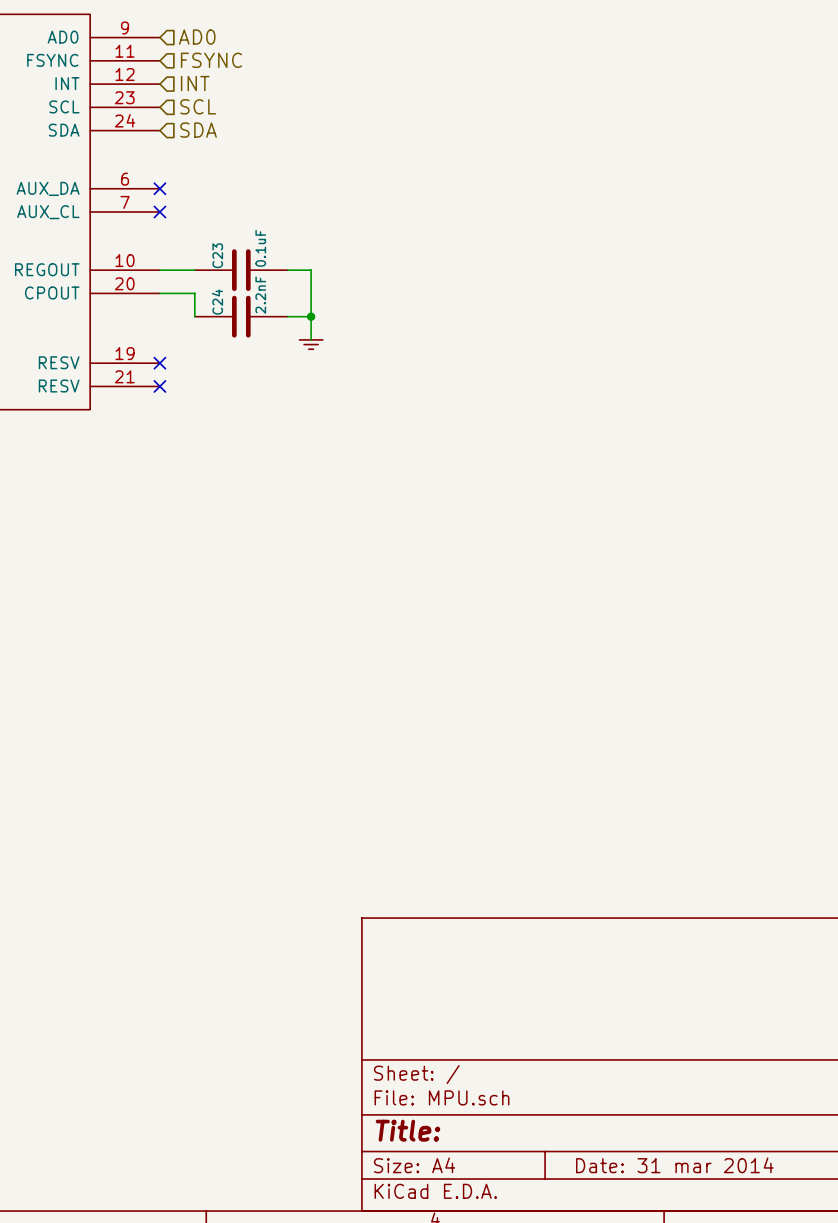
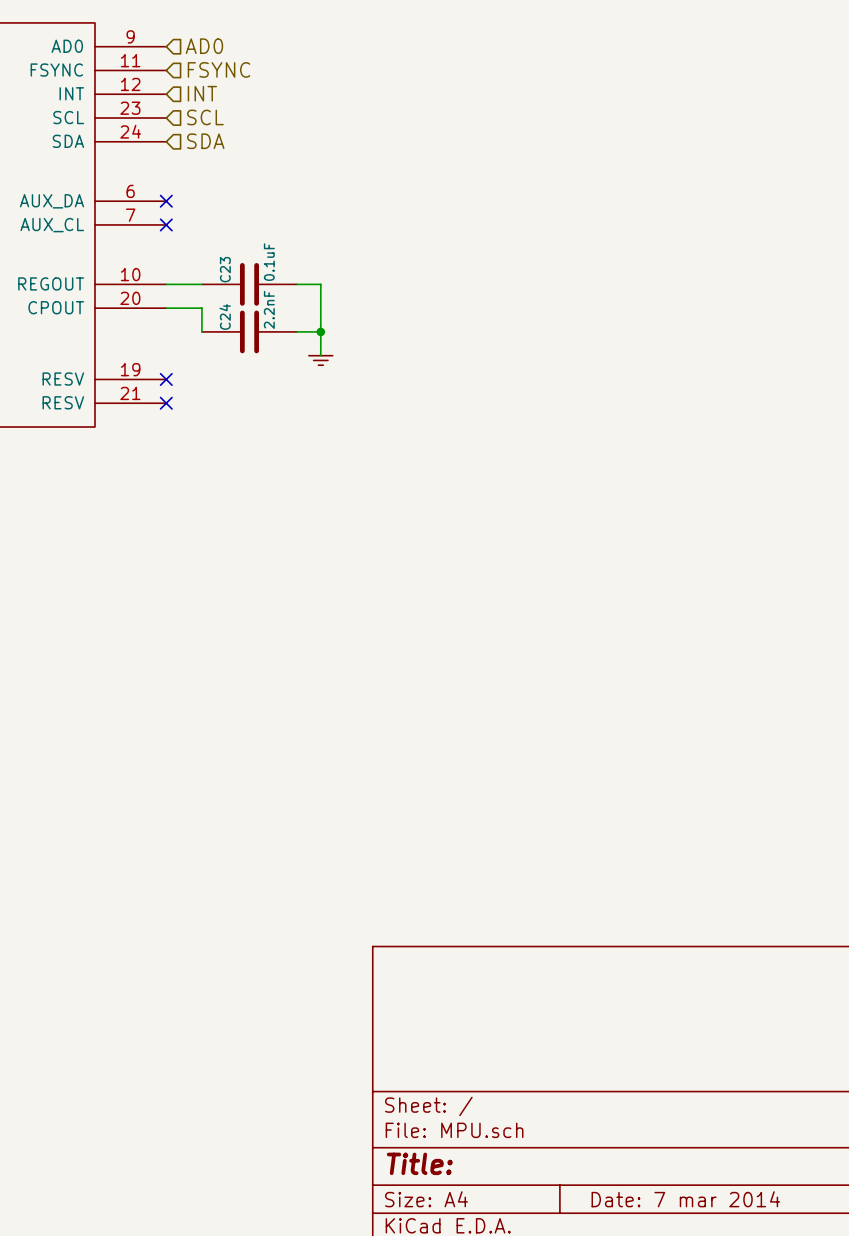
title block: Date: 31 mar 2014 (674, 1165) -> Date: 7 mar 2014 (685, 1199)

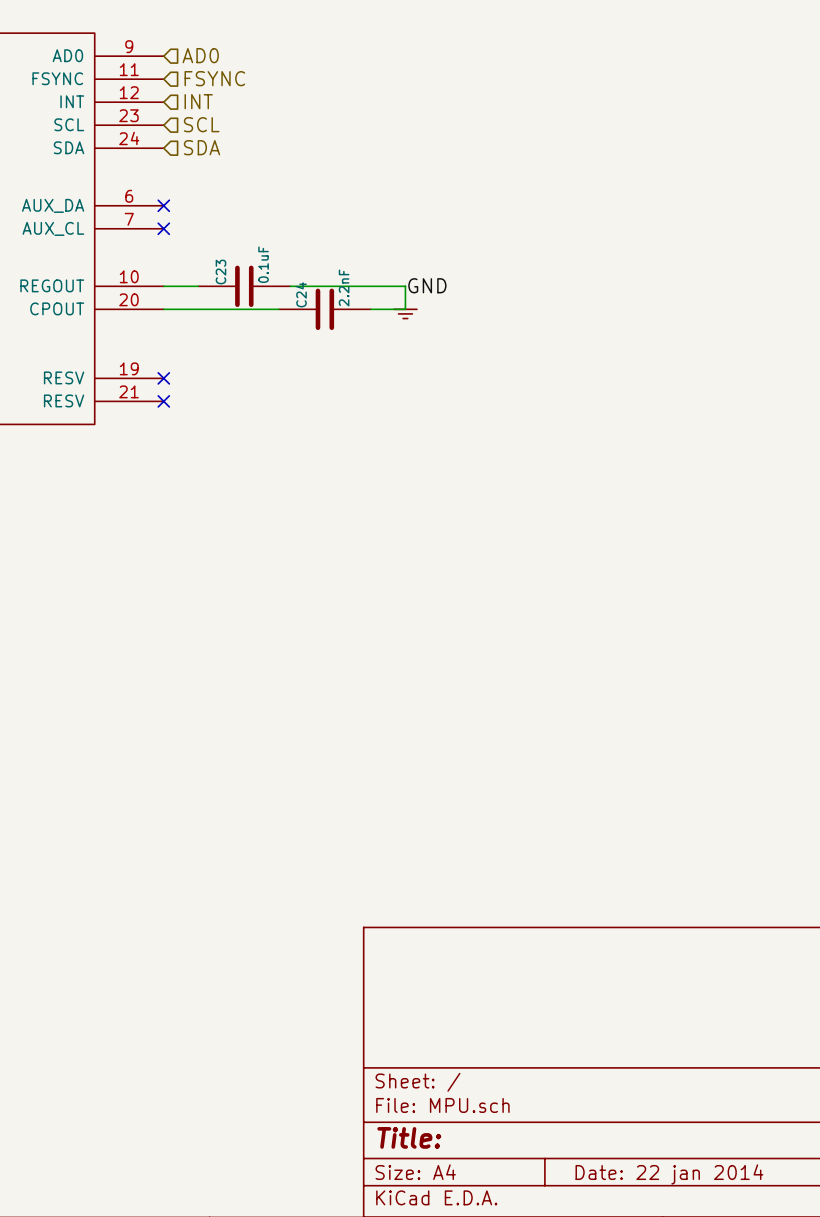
label: none -> GND (427, 285)
wire: (320, 284) (320, 355) -> (313, 286) (405, 286) (405, 309) (370, 309)
wire: (201, 308) (201, 331) -> (198, 309) (278, 309)
C24 position: (249, 331) -> (324, 309)
wire: (297, 331) (320, 331) -> none
junction: (320, 331) -> none
power symbol position: (320, 360) -> (405, 313)
title block: Date: 7 mar 2014 (685, 1199) -> Date: 22 jan 2014 (669, 1174)

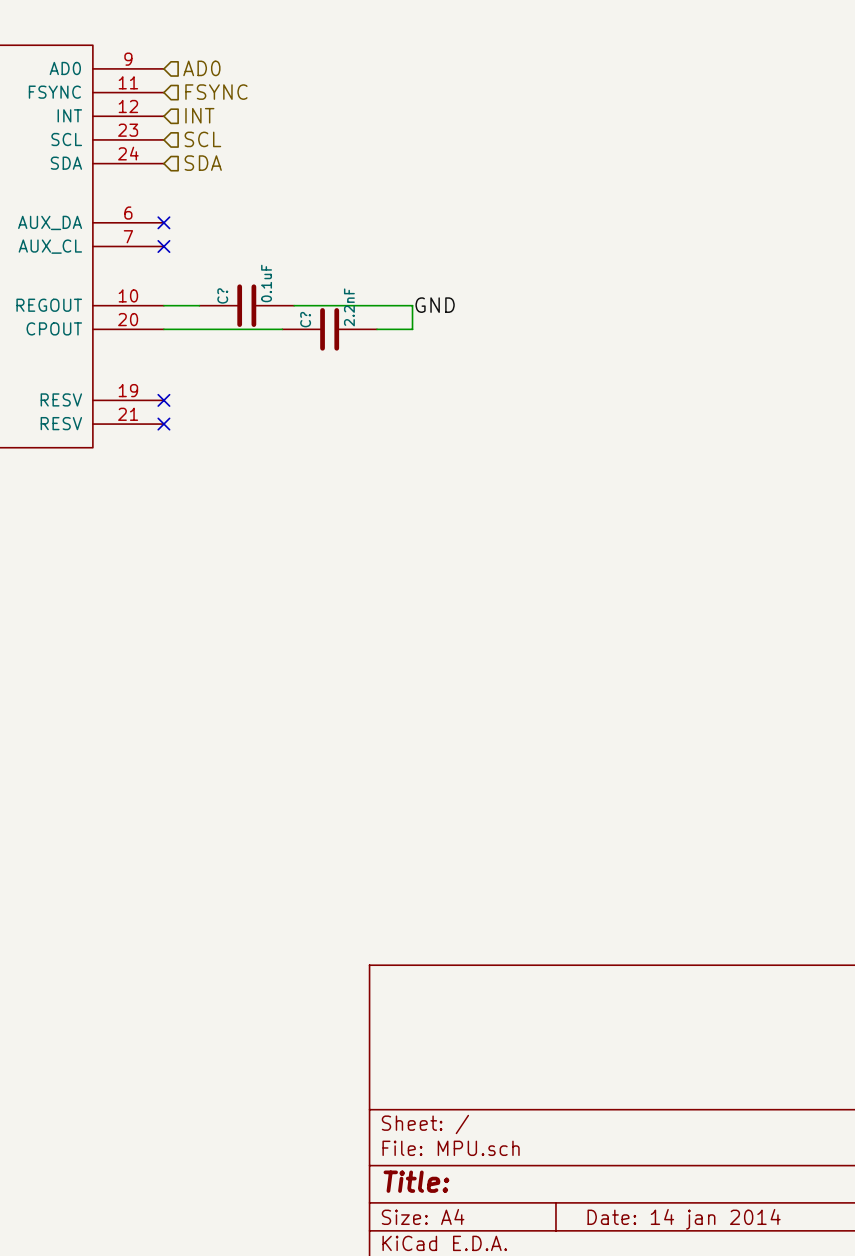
C23 name: C23 (220, 272) -> C? (222, 295)
C24 name: C24 (301, 294) -> C? (305, 319)
power symbol: (405, 313) -> none
title block: Date: 22 jan 2014 (669, 1174) -> Date: 14 jan 2014 (684, 1219)

